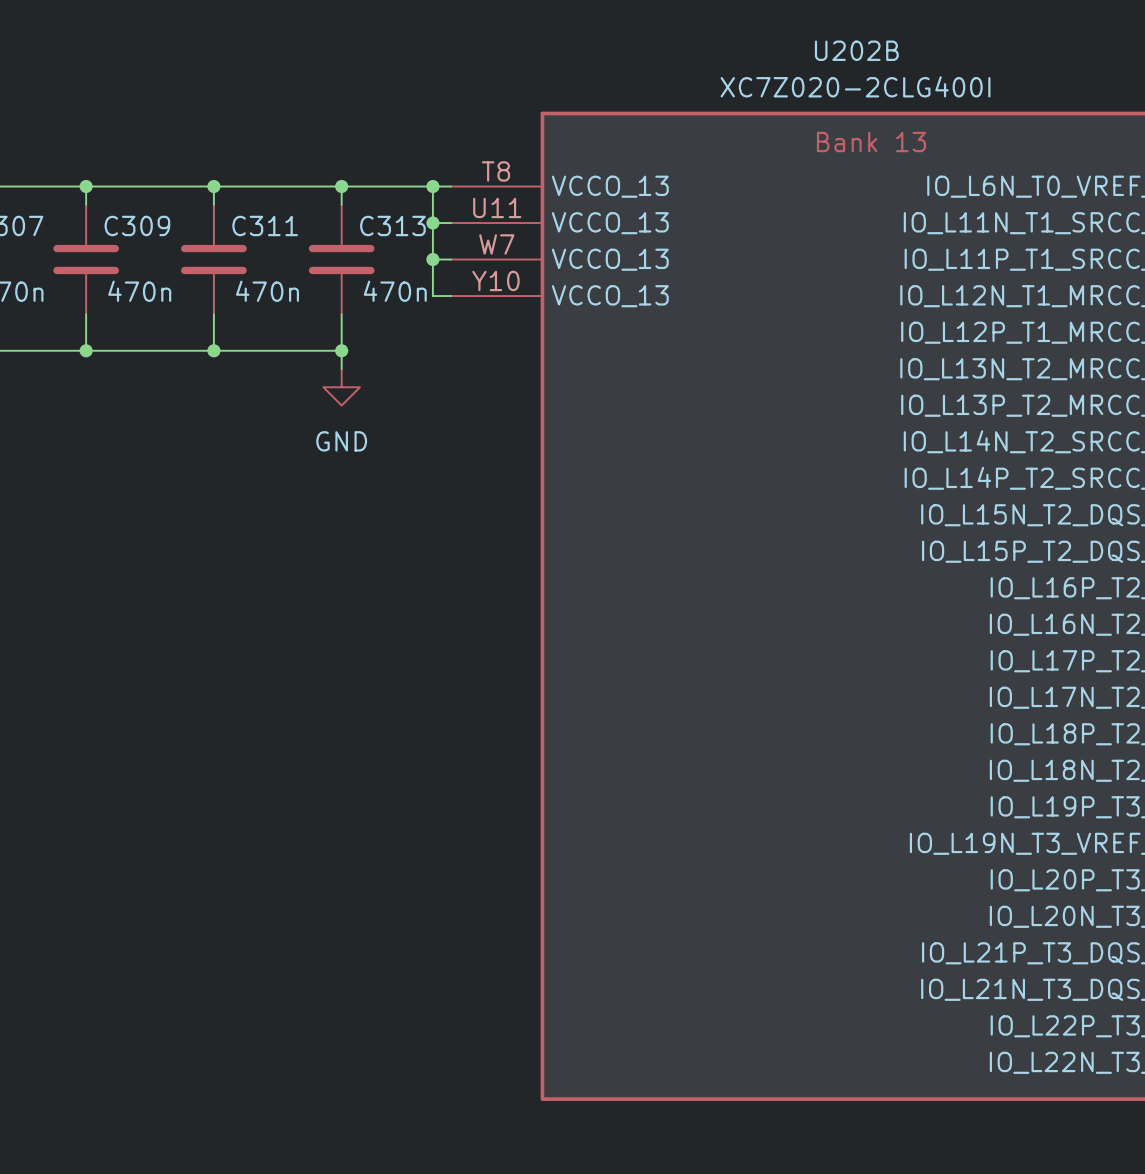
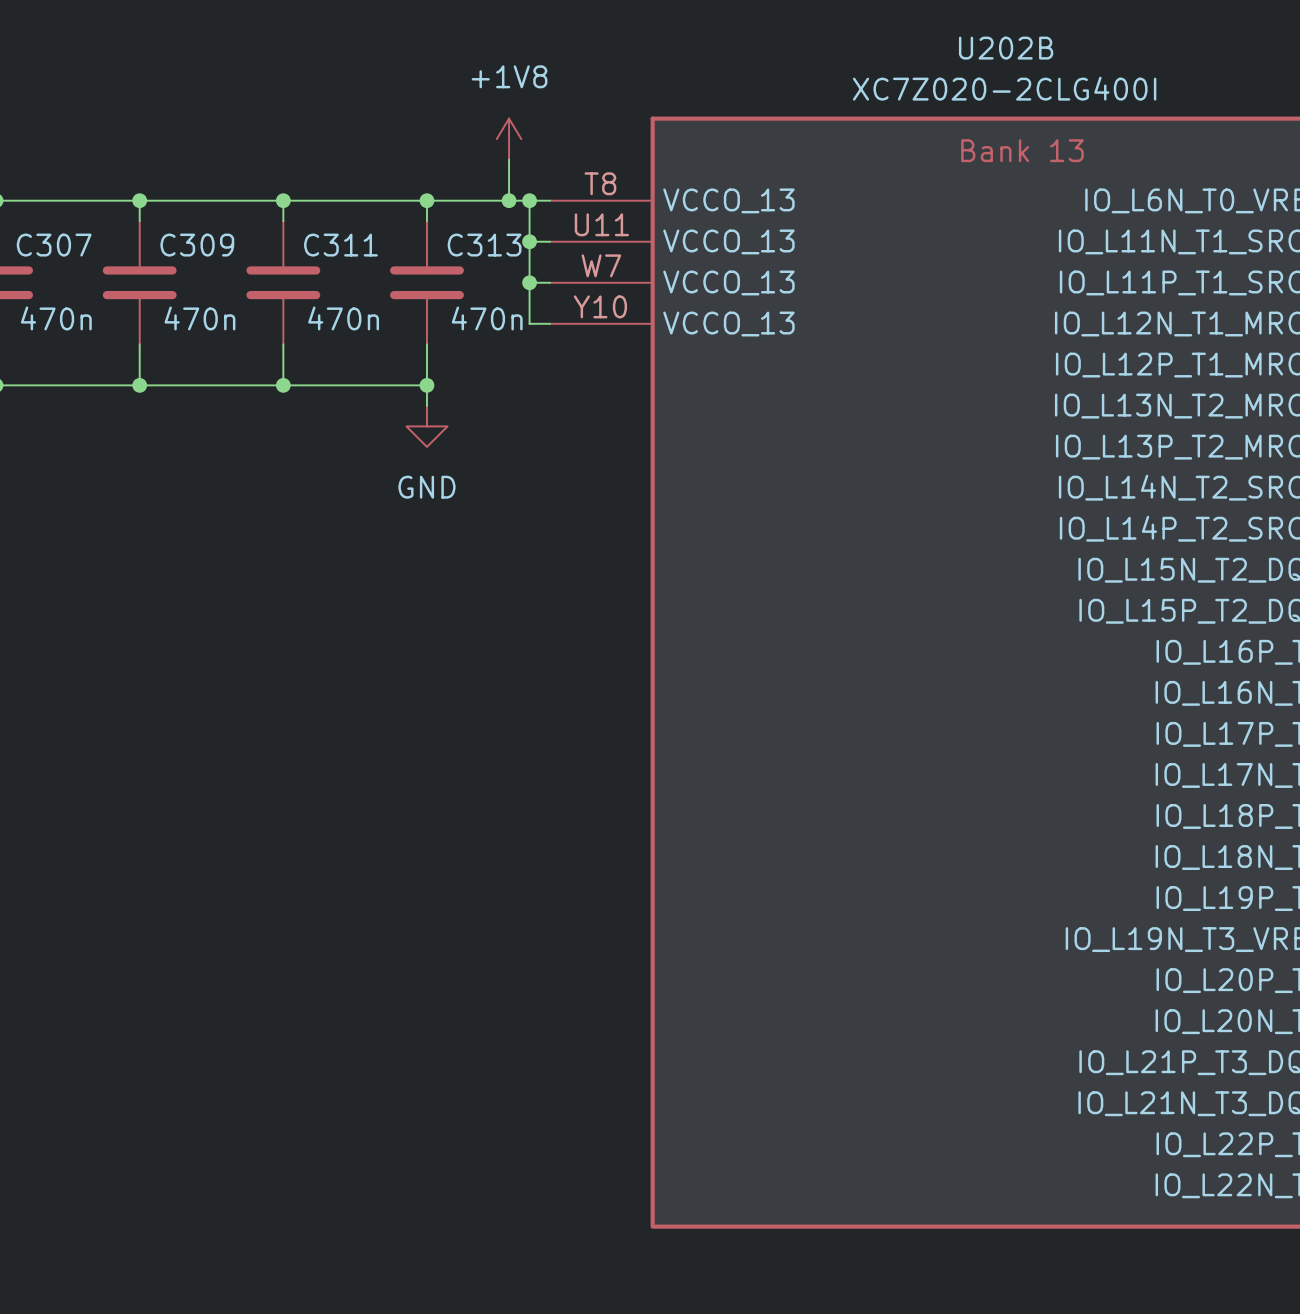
power symbol: none -> +1V8 (509, 139)
wire: none -> (509, 159) (509, 200)
junction: none -> (509, 200)

